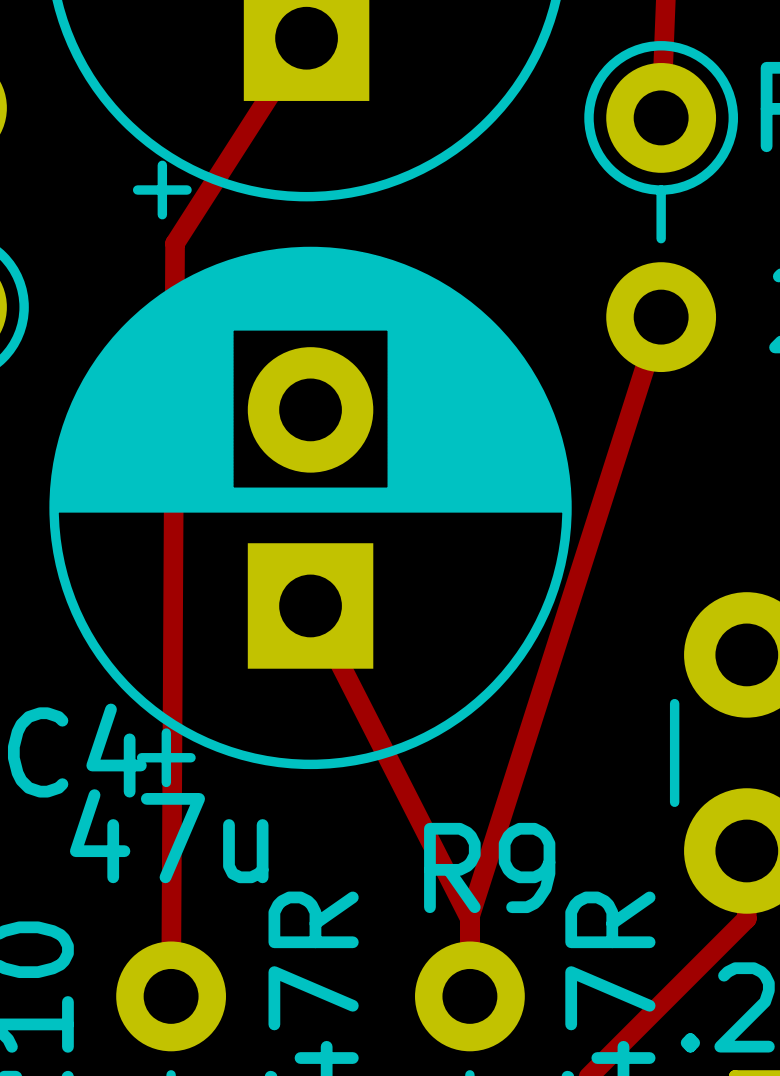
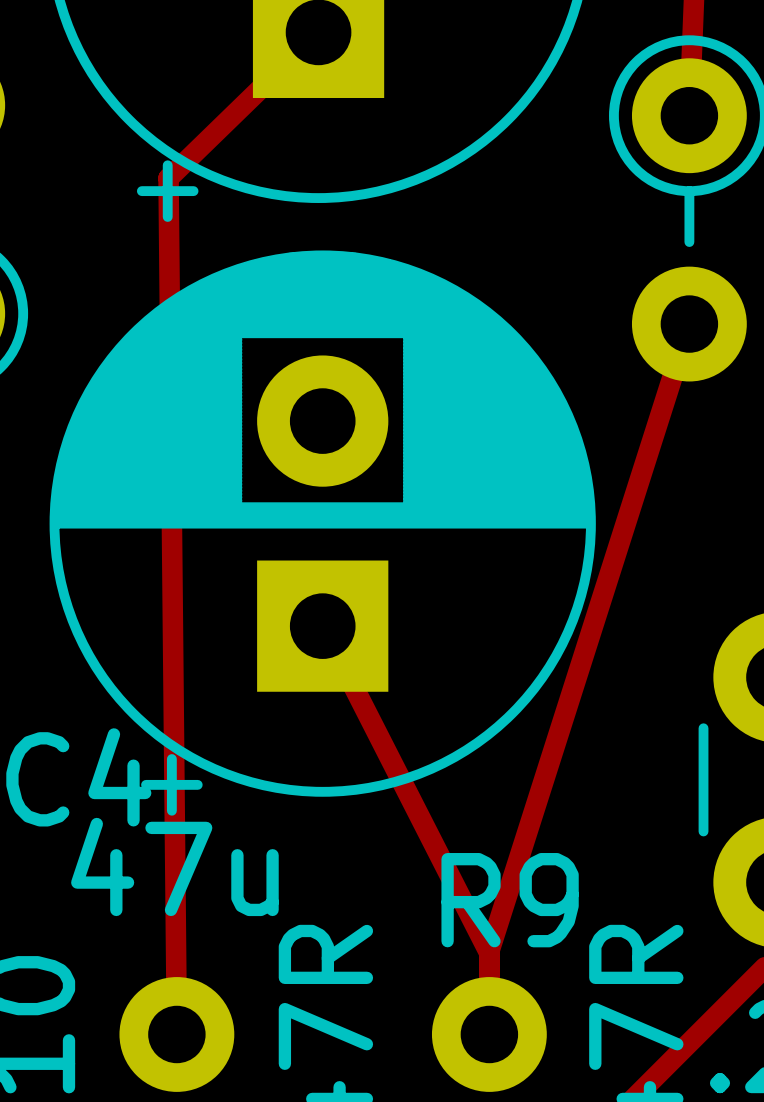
track: (306, 38) (175, 243) (171, 996) -> (318, 32) (168, 178) (176, 1034)

